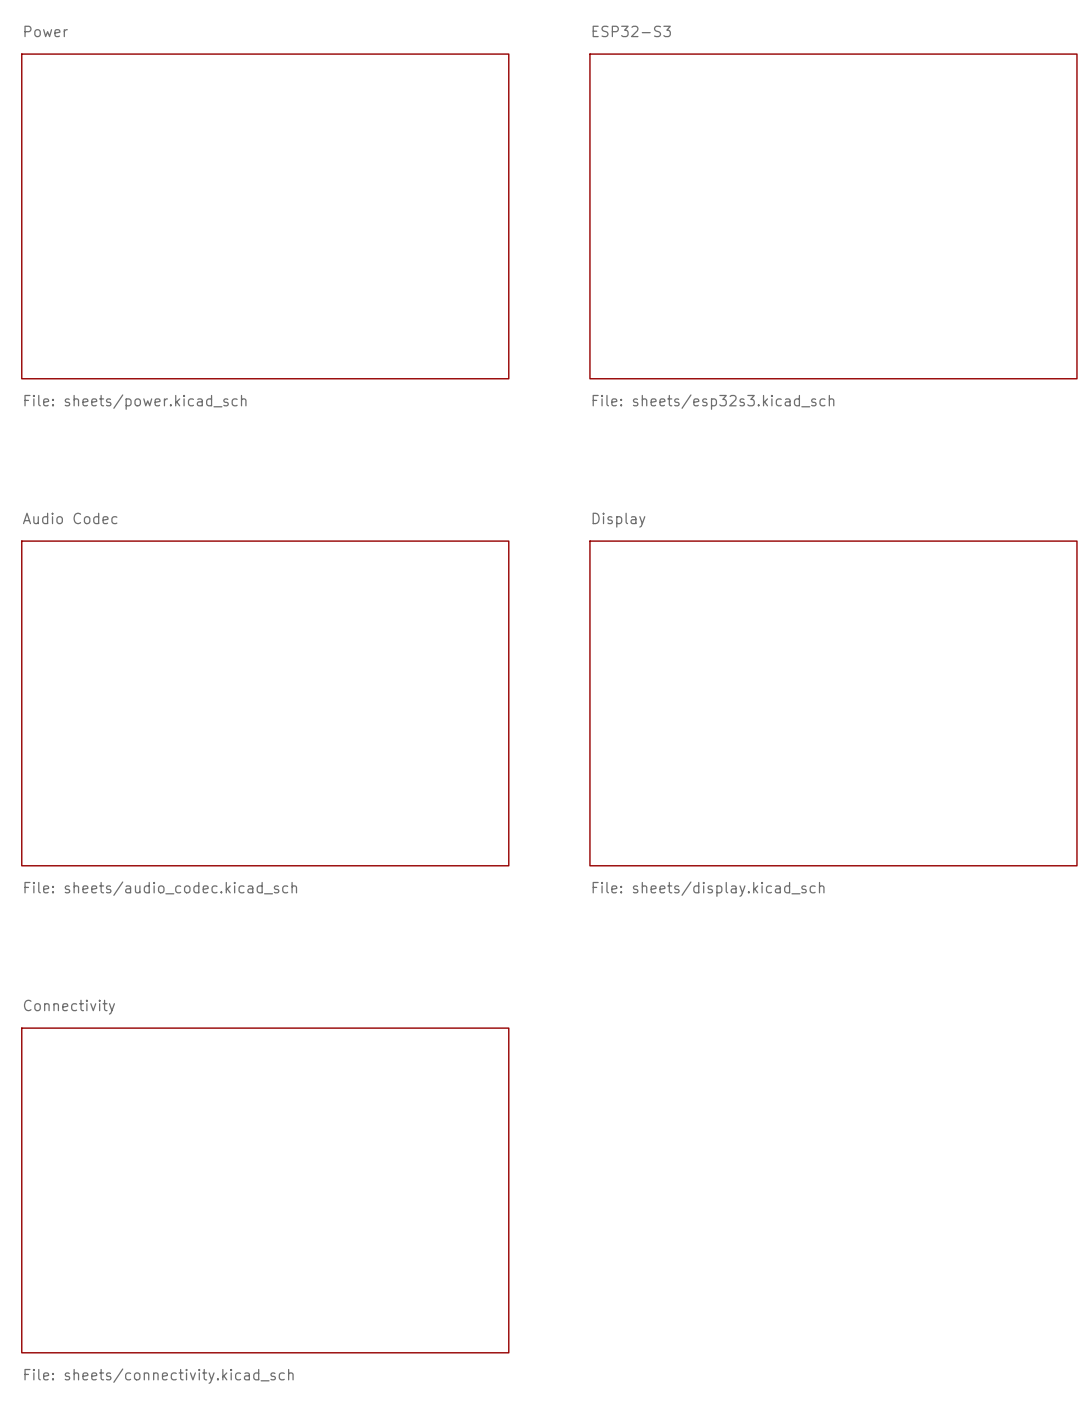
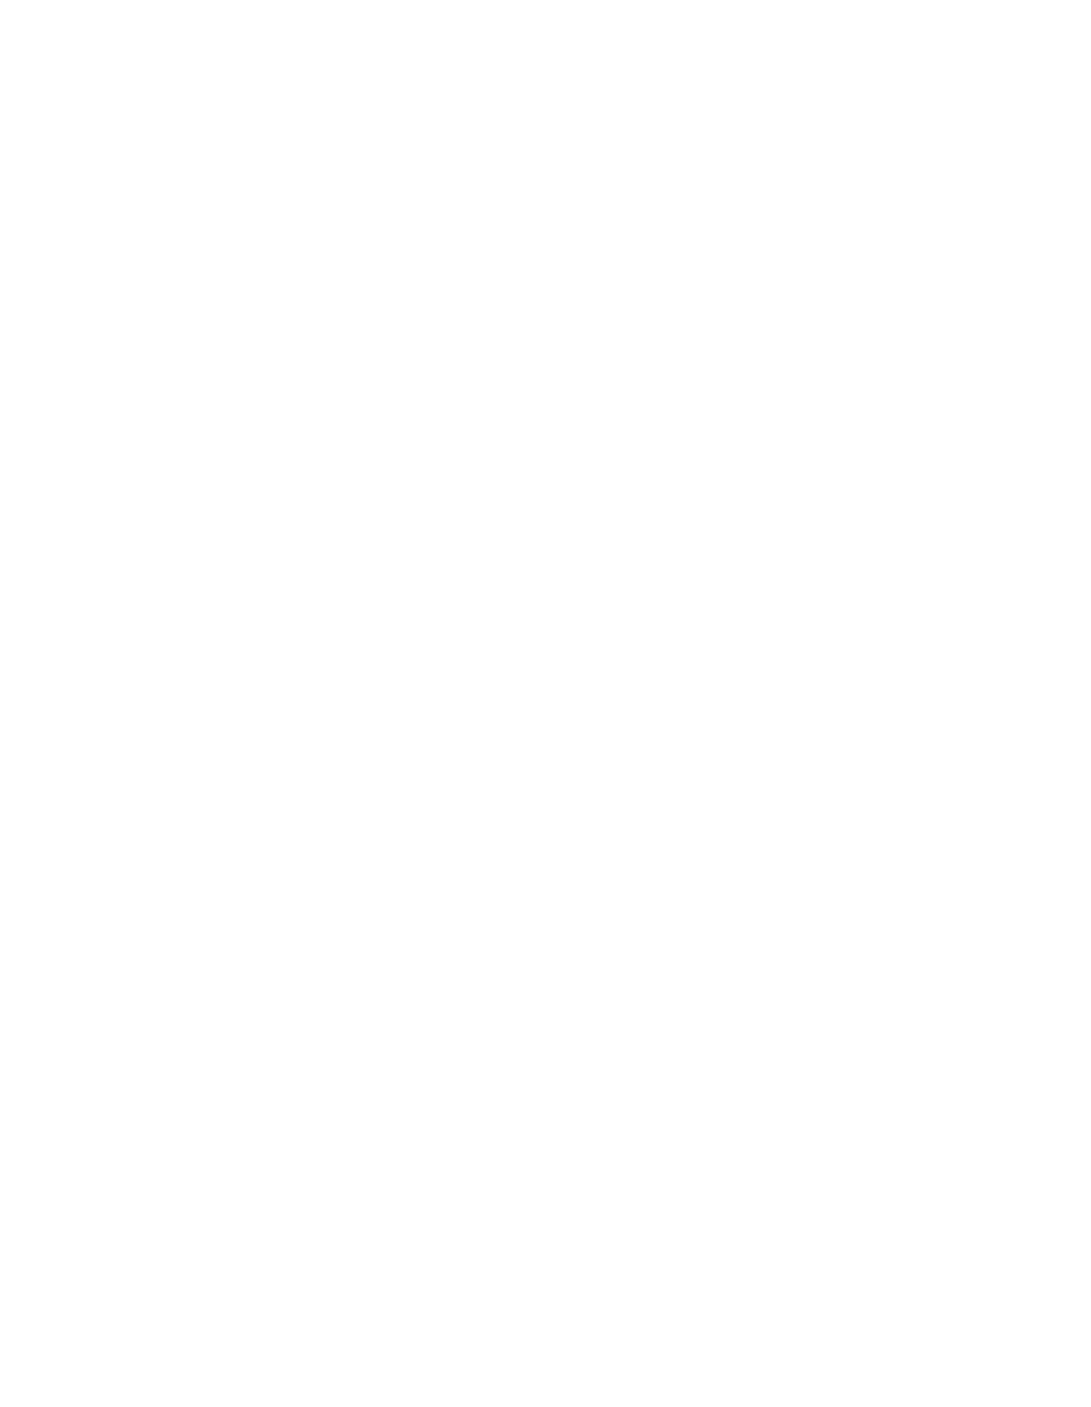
sheet Power: File: sheets/power.kicad_sch (265, 216) -> none
sheet ESP32-S3: File: sheets/esp32s3.kicad_sch (833, 216) -> none
sheet Audio Codec: File: sheets/audio_codec.kicad_sch (265, 703) -> none
sheet Display: File: sheets/display.kicad_sch (833, 703) -> none
sheet Connectivity: File: sheets/connectivity.kicad_sch (265, 1190) -> none

